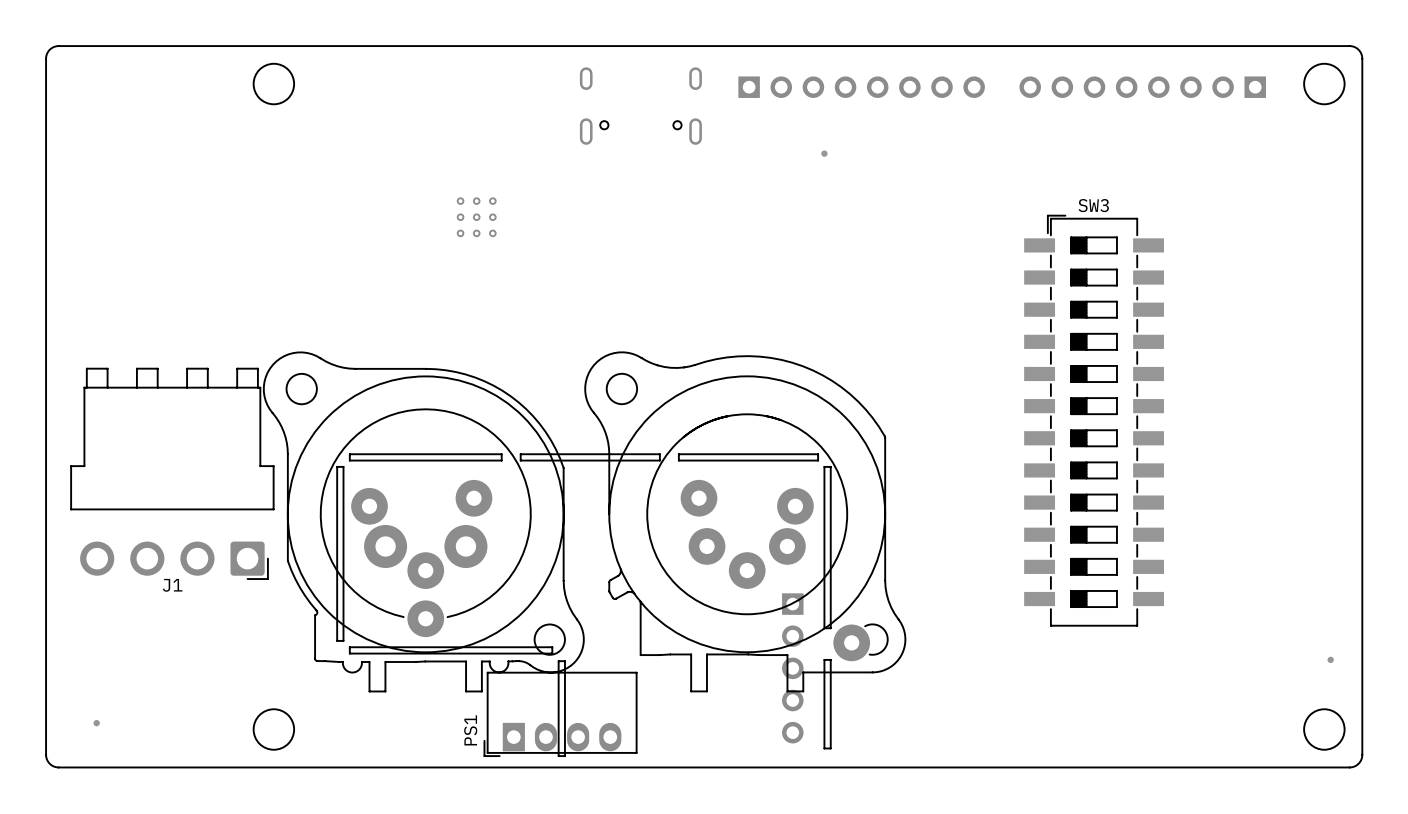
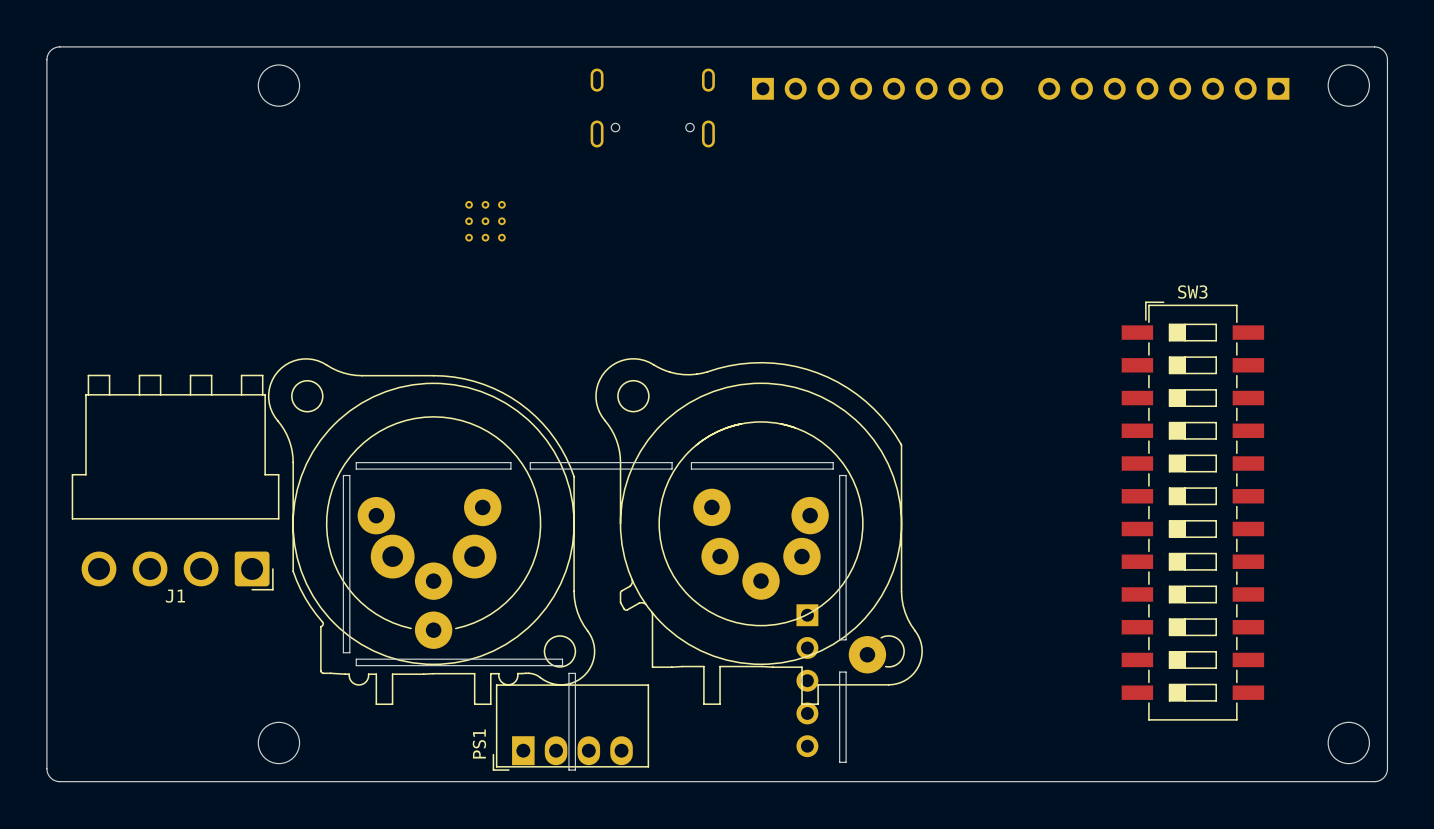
part: (824, 153) -> none
SW3 position: (1094, 420) -> (1192, 511)
part: (1330, 659) -> none
part: (96, 723) -> none

